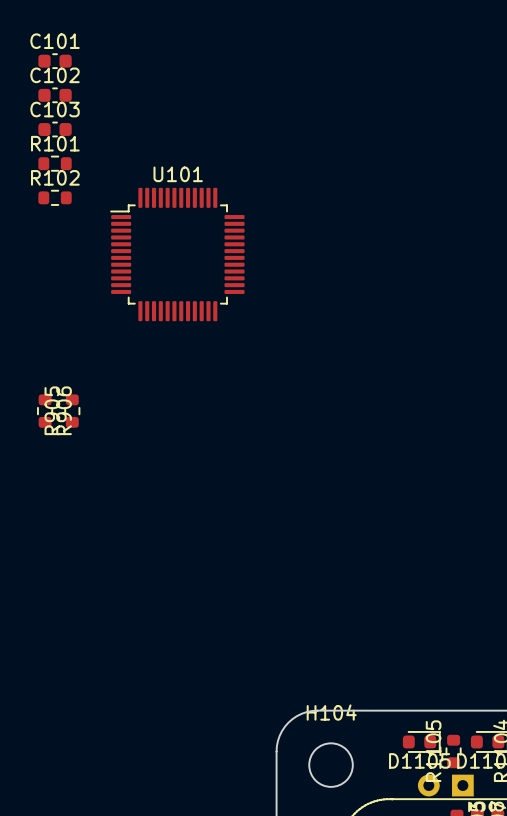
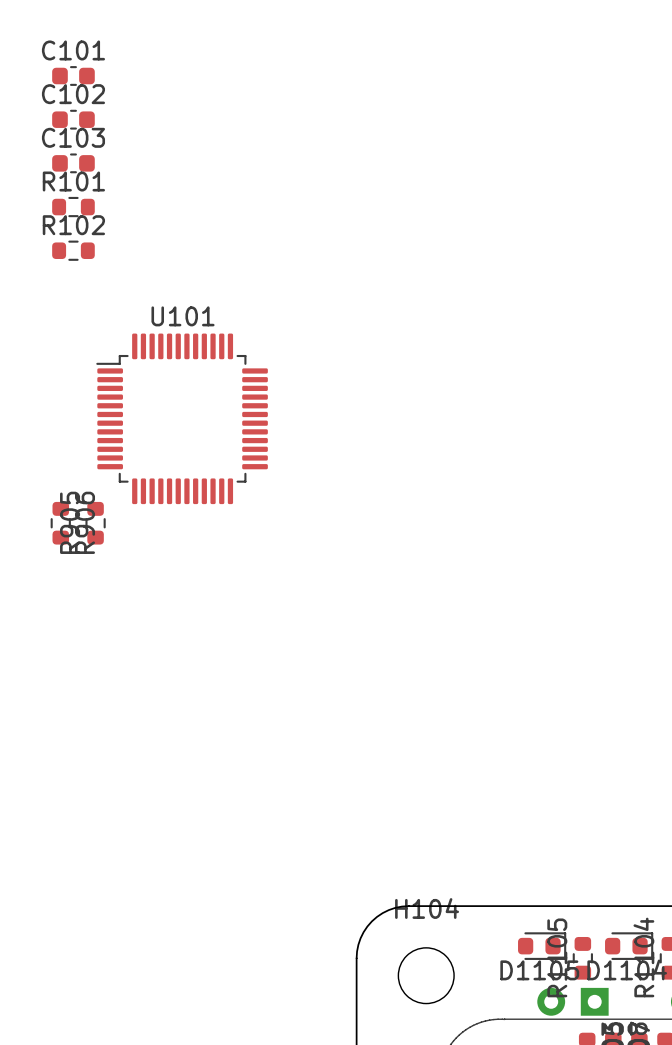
U101 position: (177, 254) -> (182, 418)

